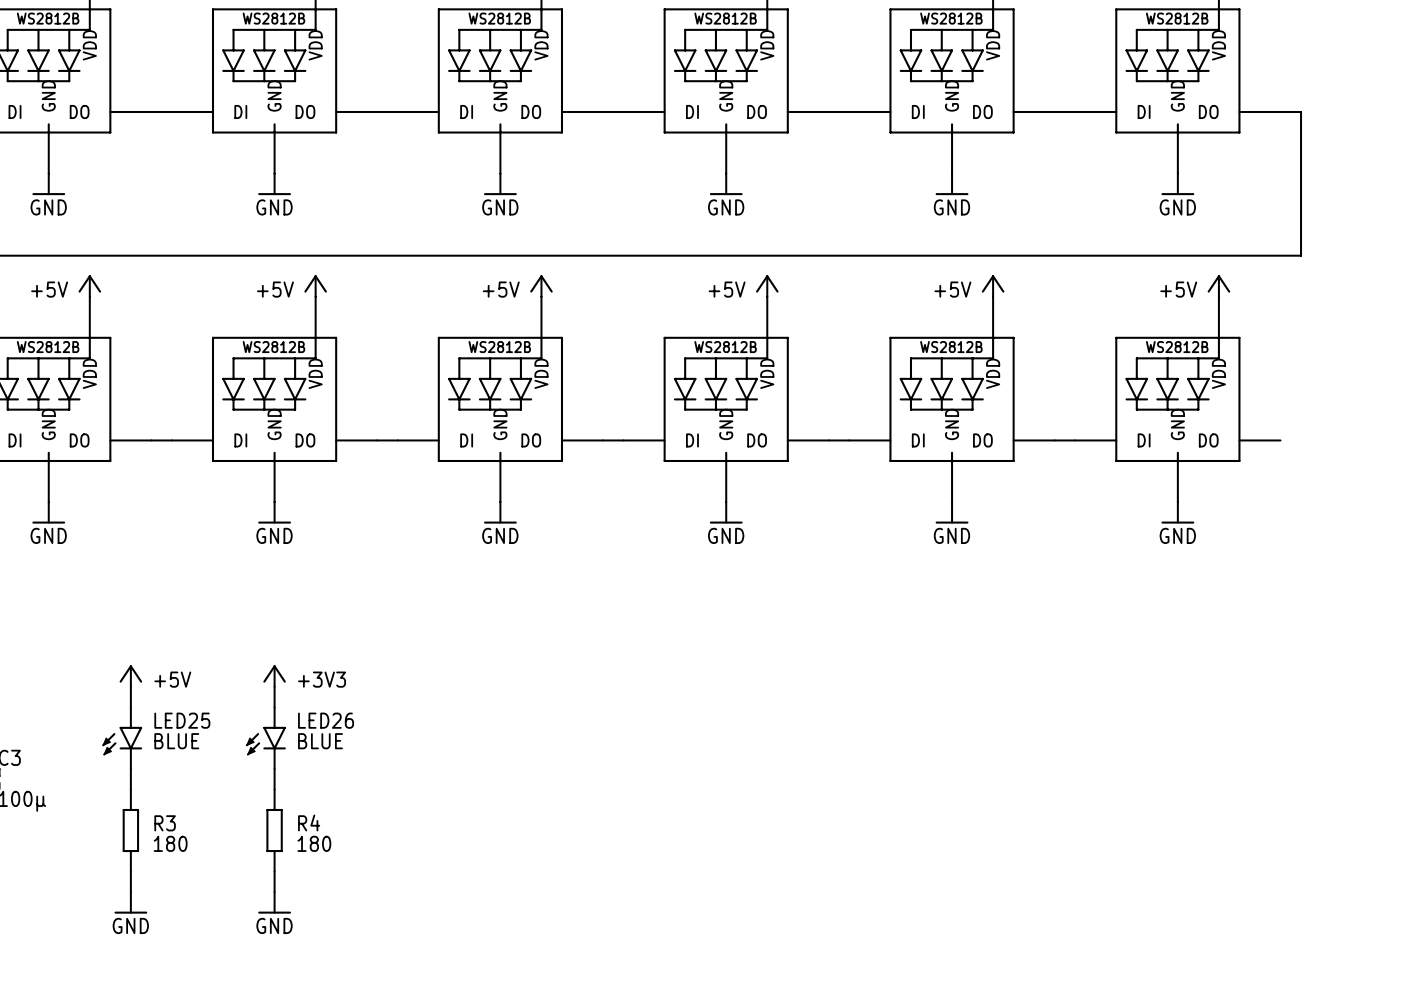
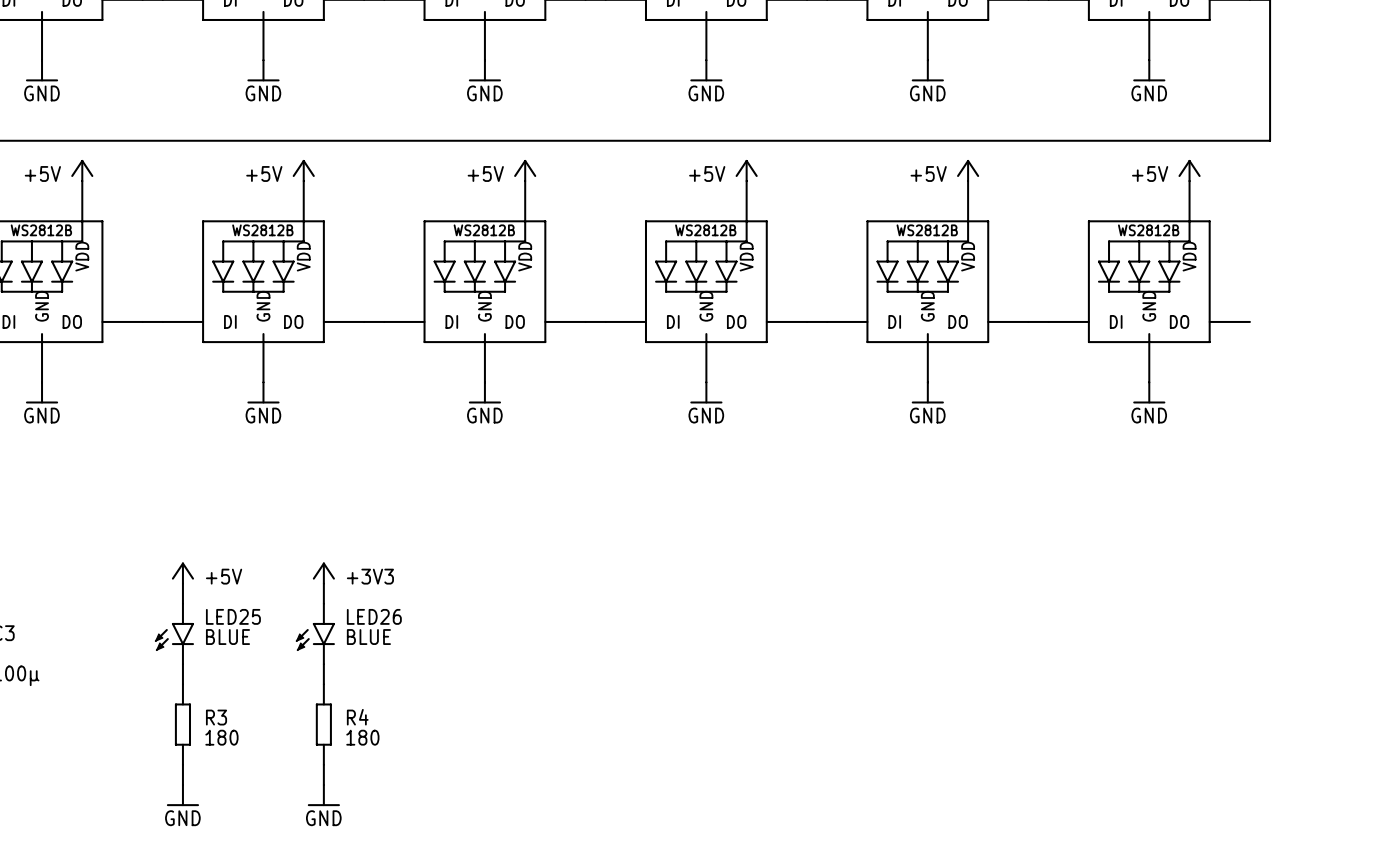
power symbol position: +5V (130, 676) -> +5V (182, 573)
power symbol position: +3V3 (274, 676) -> +3V3 (323, 573)
wire: (130, 686) (130, 707) -> (182, 583) (182, 603)
wire: (274, 686) (274, 707) -> (323, 583) (323, 603)
LED25 position: (122, 738) -> (174, 634)
LED26 position: (266, 738) -> (315, 634)
wire: (130, 768) (130, 789) -> (182, 664) (182, 684)
wire: (274, 768) (274, 789) -> (323, 664) (323, 684)
R3 position: (130, 830) -> (182, 724)
R4 position: (274, 830) -> (323, 724)
wire: (130, 871) (130, 892) -> (182, 764) (182, 784)
wire: (274, 871) (274, 892) -> (323, 764) (323, 784)
power symbol: GND (130, 902) -> none
power symbol: GND (274, 902) -> none
power symbol: none -> GND (182, 795)
power symbol: none -> GND (323, 795)

